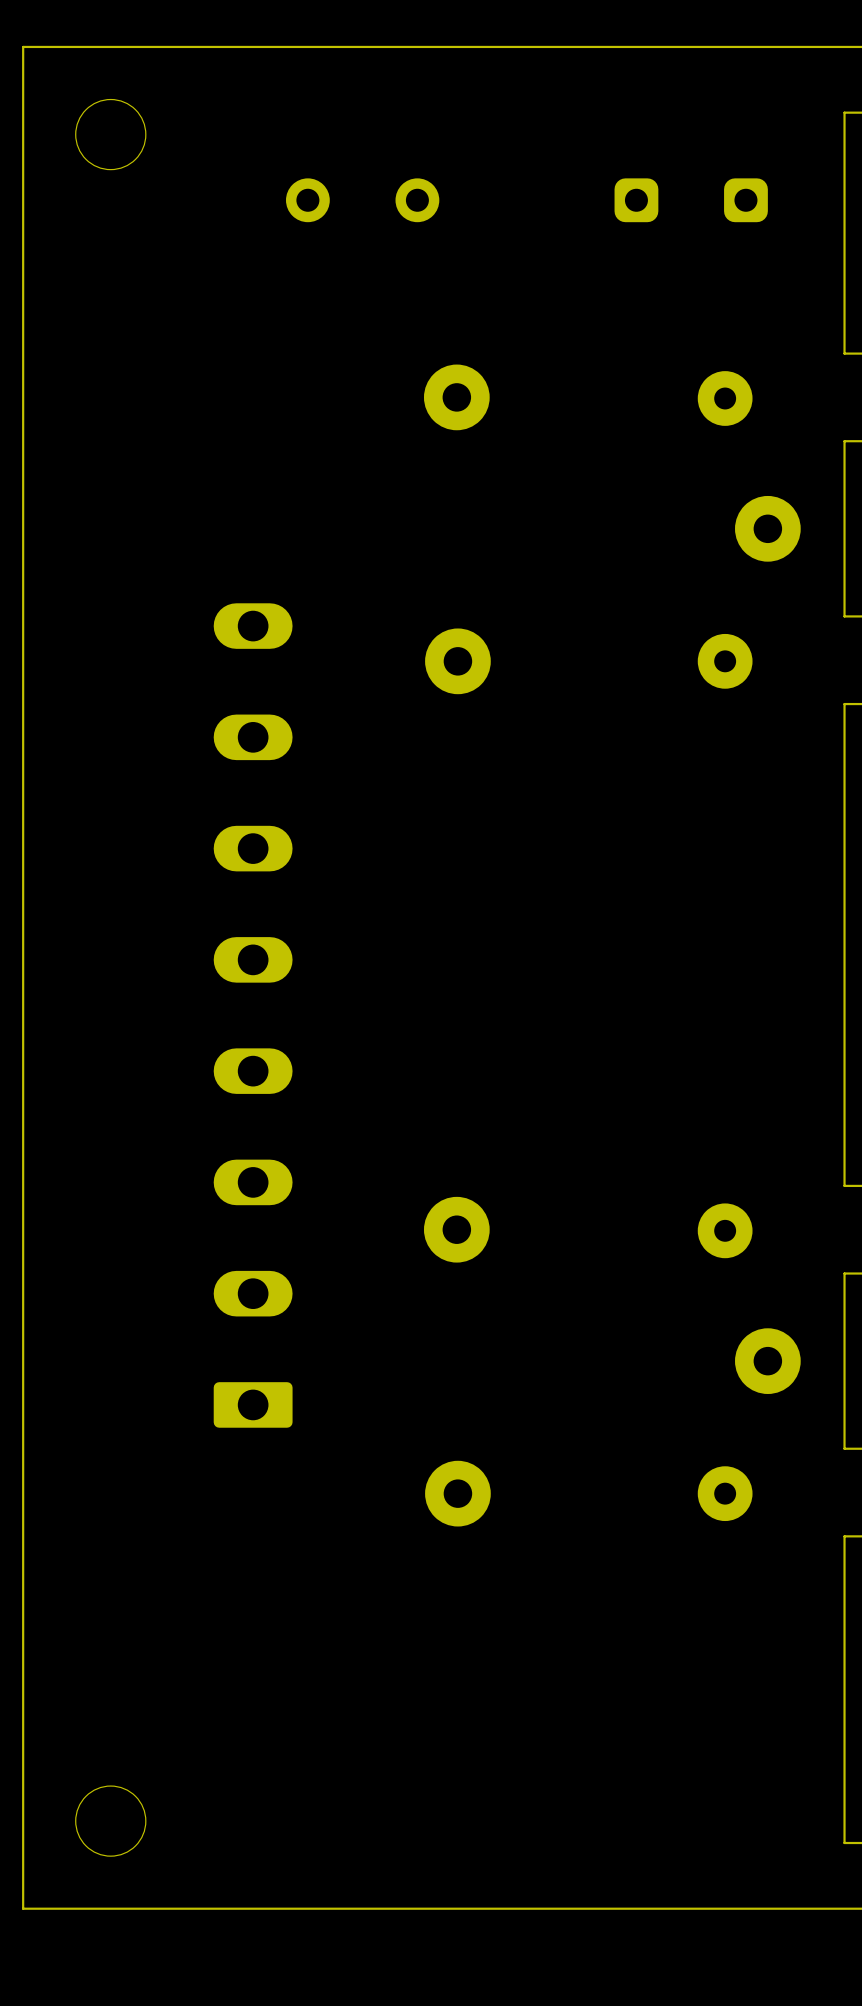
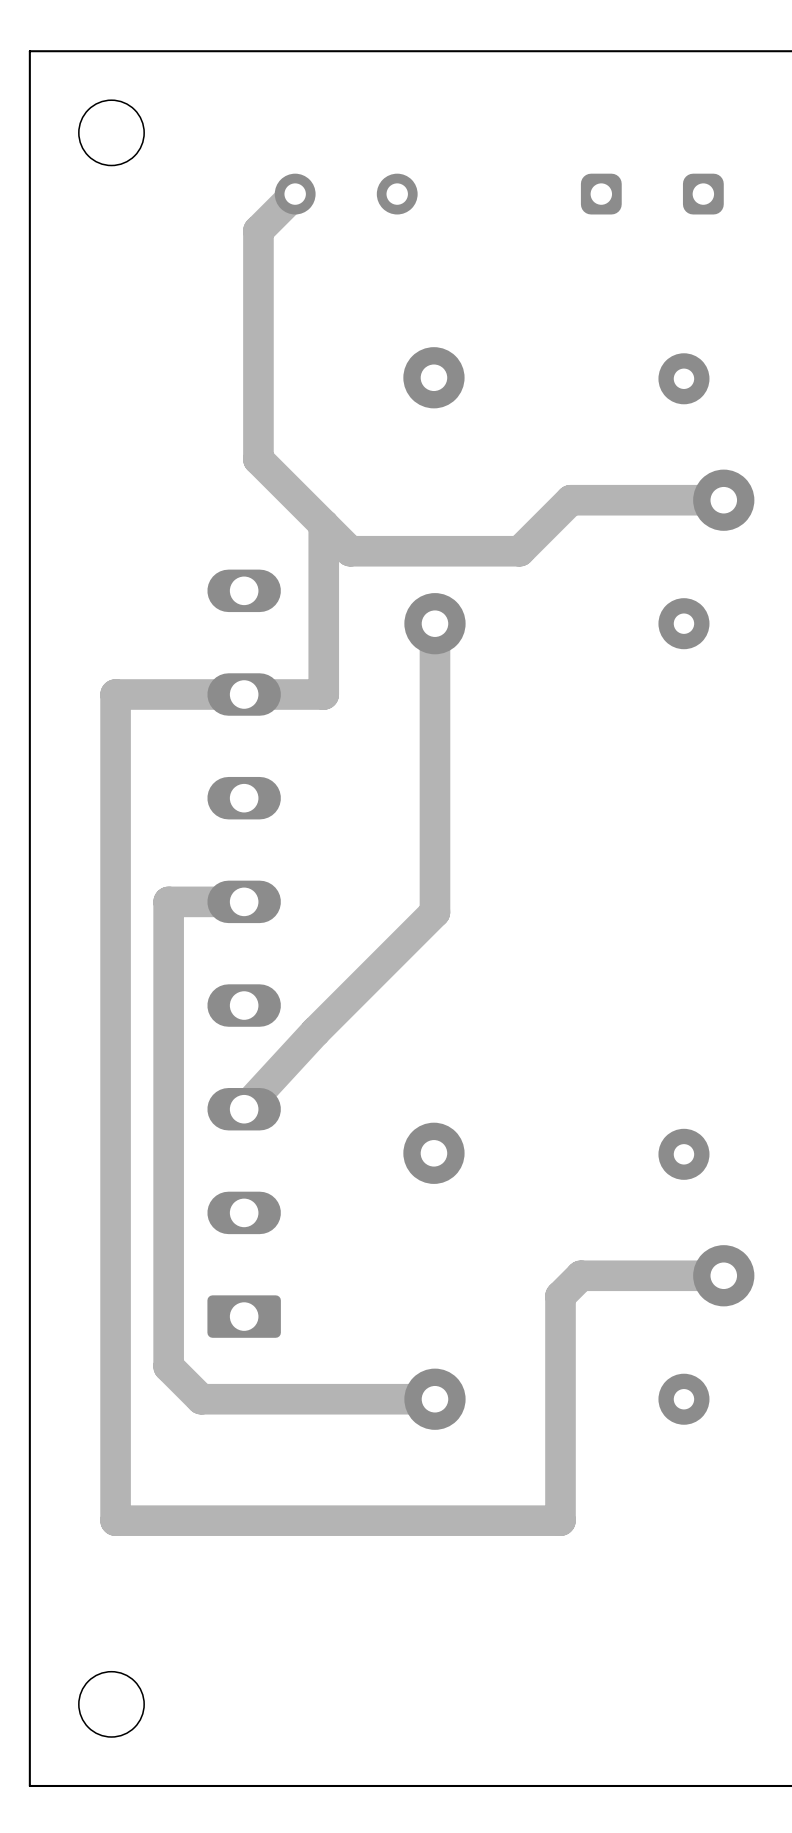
track: none -> (295, 194) (258, 230) (258, 459) (350, 551) (519, 551) (570, 500) (723, 500)
track: none -> (323, 524) (323, 694) (115, 694) (115, 1520) (560, 1520) (560, 1296) (580, 1275) (723, 1275)
track: none -> (434, 623) (434, 912) (315, 1031) (244, 1109)
track: none -> (244, 901) (168, 901) (168, 1366) (201, 1399) (434, 1399)

